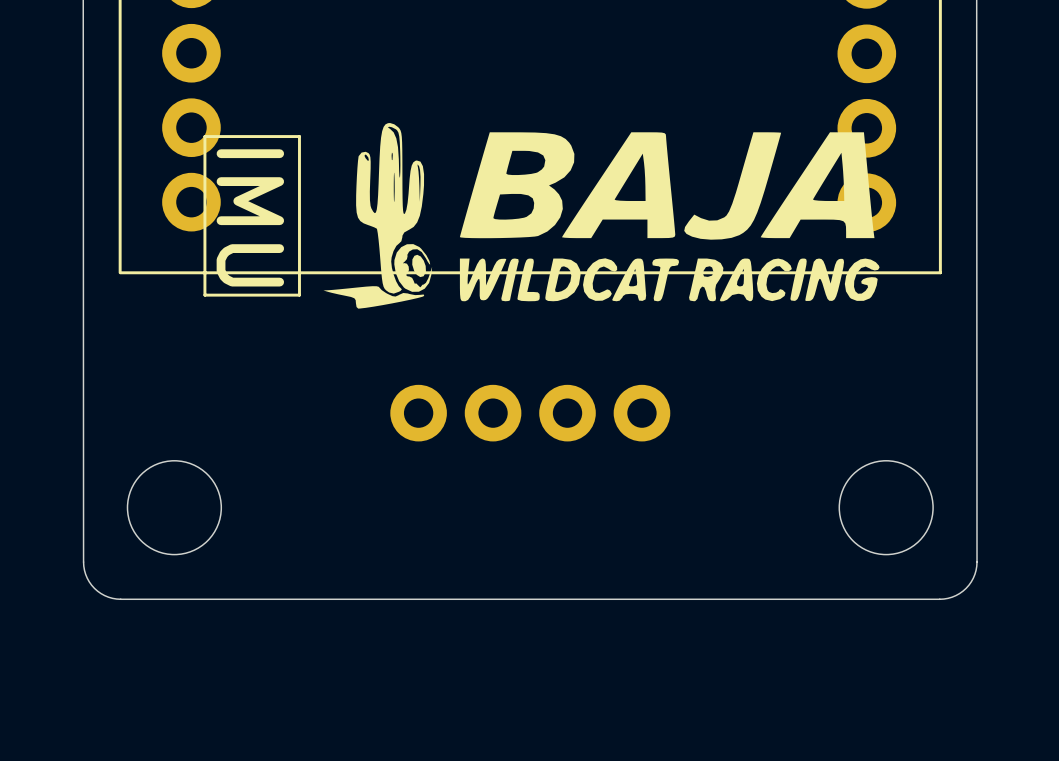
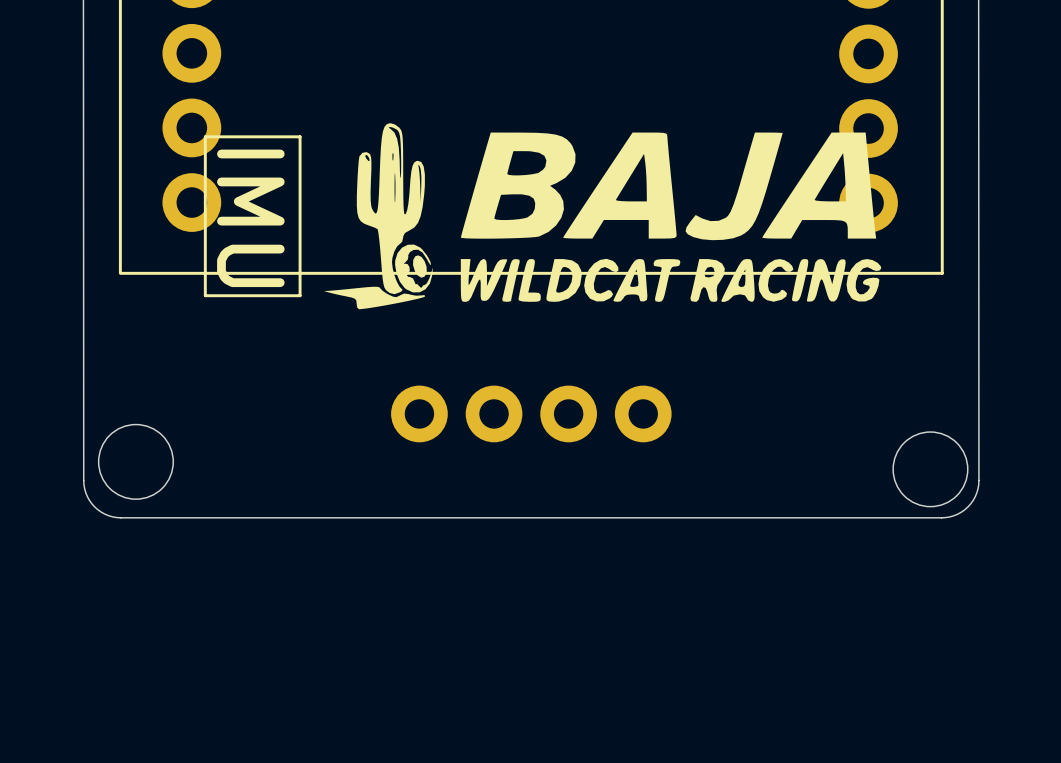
round board edge: none -> [97, 423, 174, 500]
round board edge: none -> [892, 431, 969, 508]
round board edge: [126, 460, 223, 556] -> none
round board edge: [838, 460, 934, 556] -> none
board edge: (83, 479) (83, 562) (85, 574) (97, 591) (108, 597) (120, 599) (943, 599) (962, 591) (971, 581) (976, 570) (977, 479) -> (83, 480) (87, 496) (94, 506) (108, 515) (121, 517) (941, 517) (953, 515) (968, 506) (976, 492) (978, 480)

